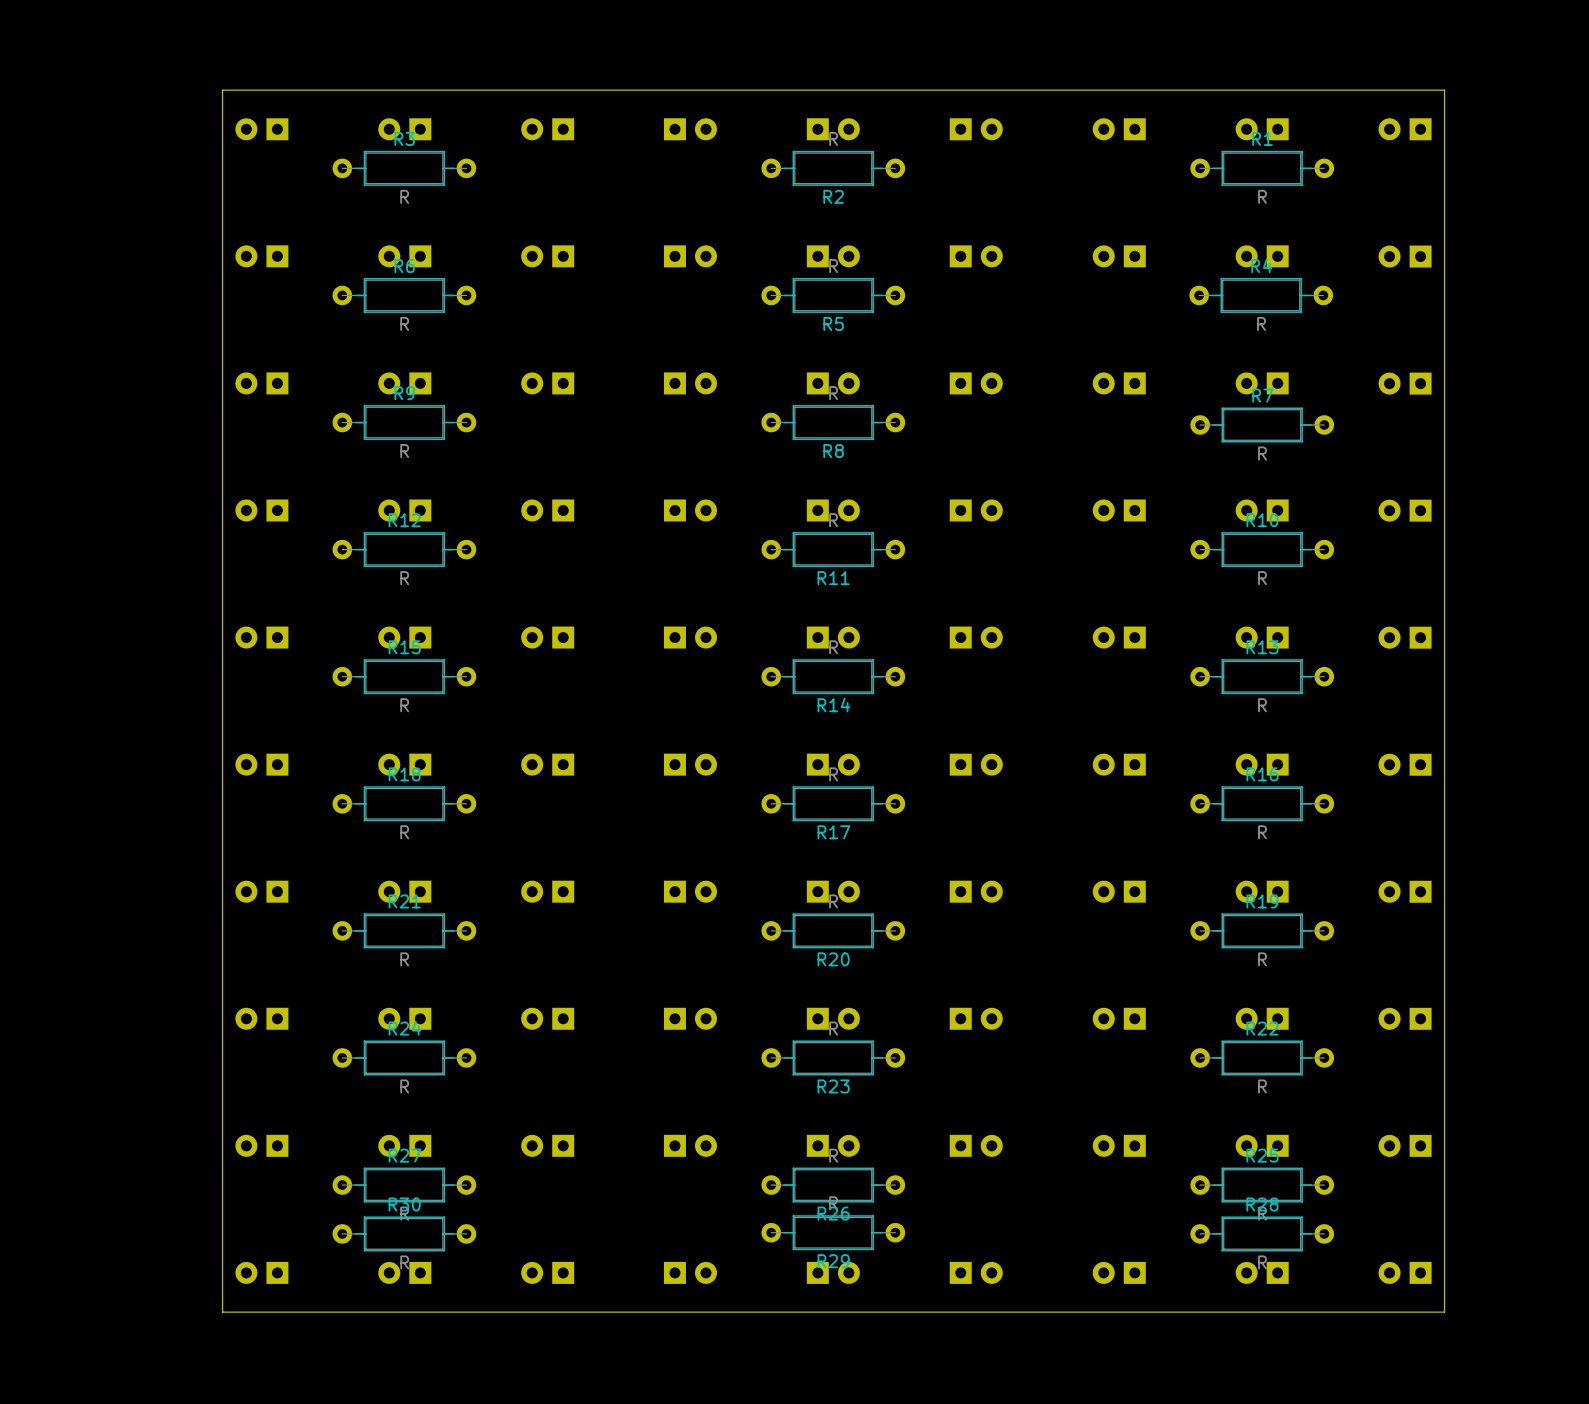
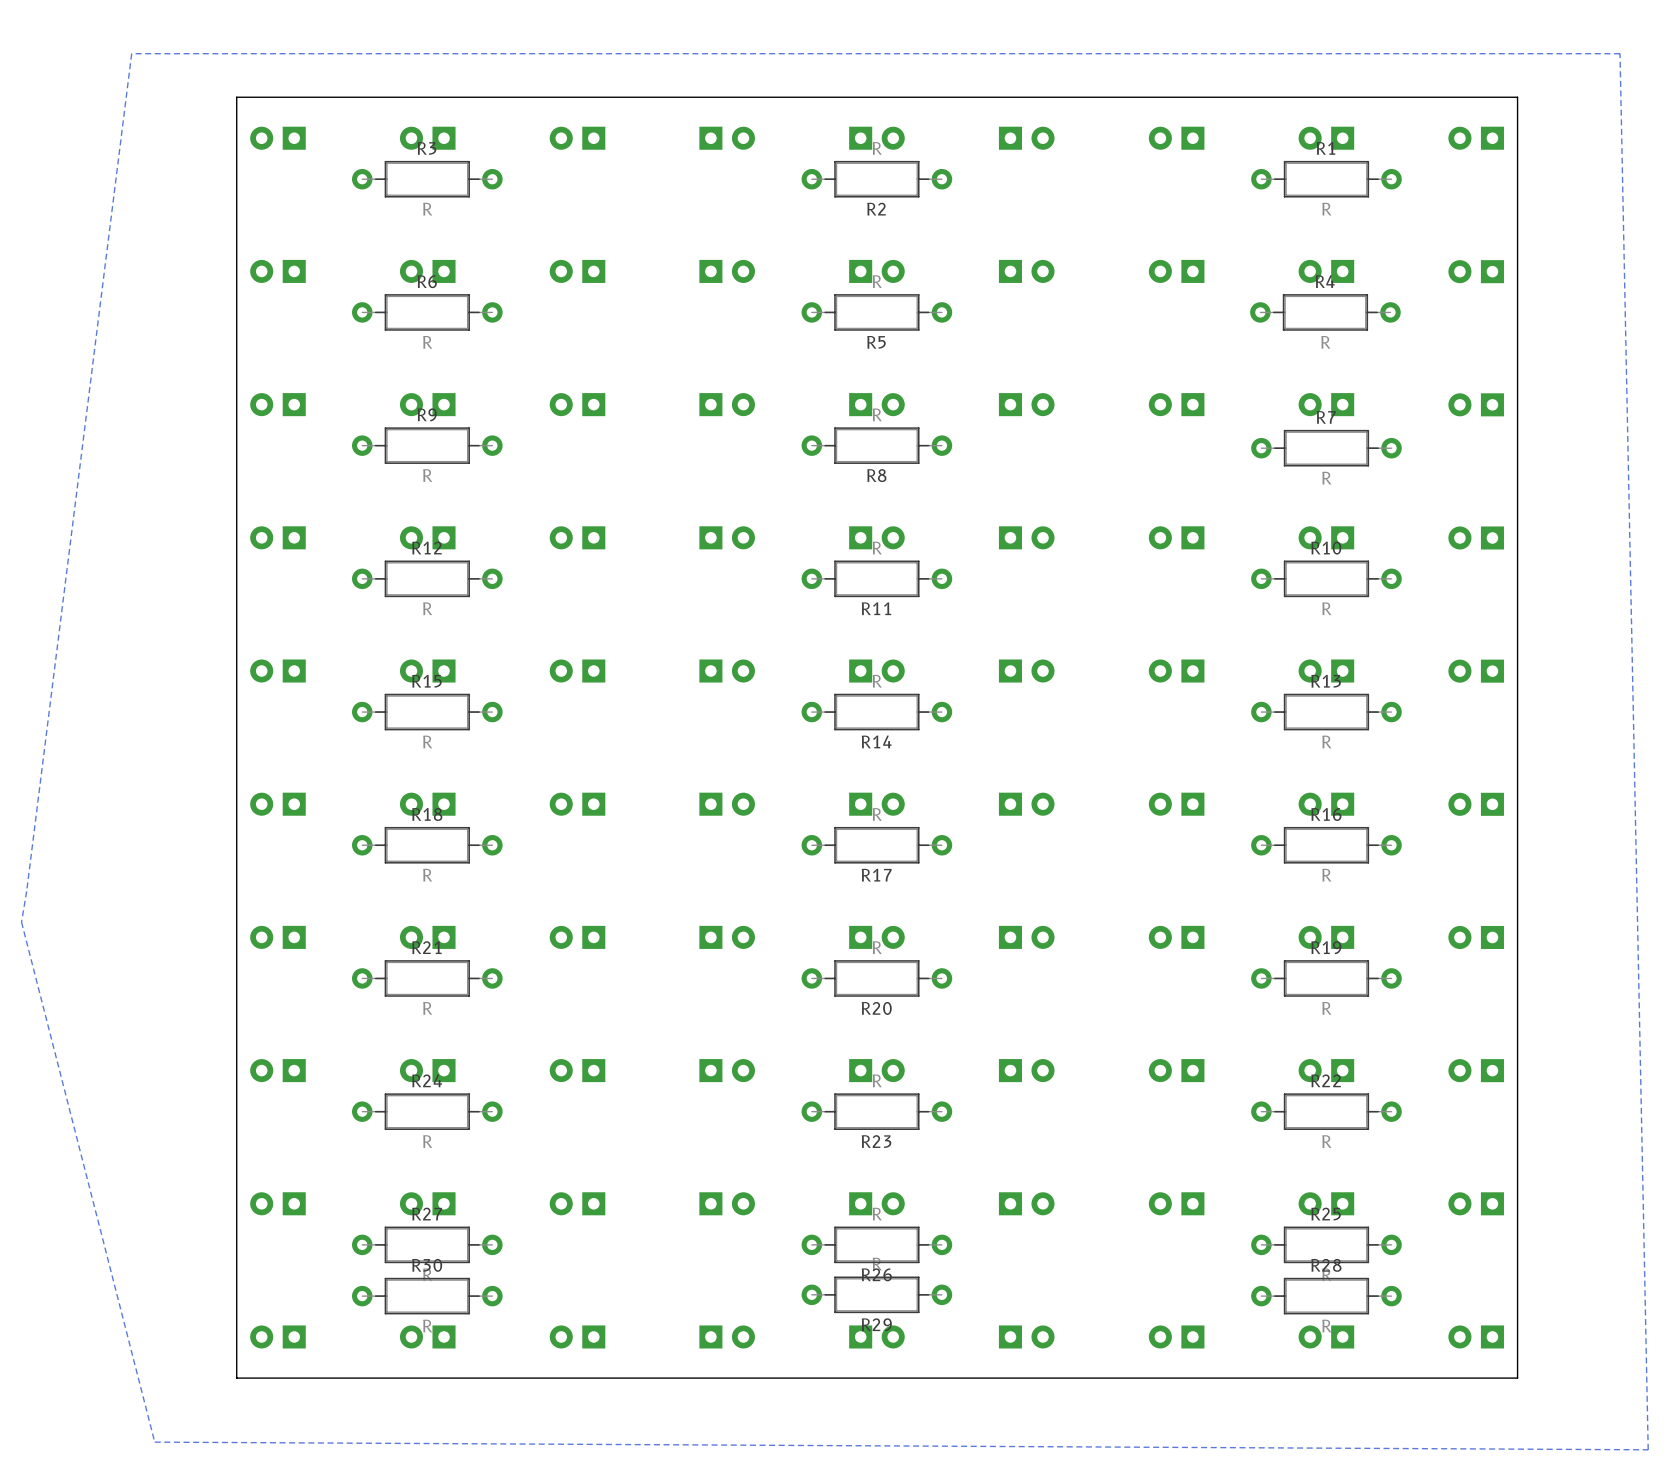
zone outline: none -> (1620, 53) (1648, 1449) (154, 1442) (21, 922) (131, 53) (1620, 53)

